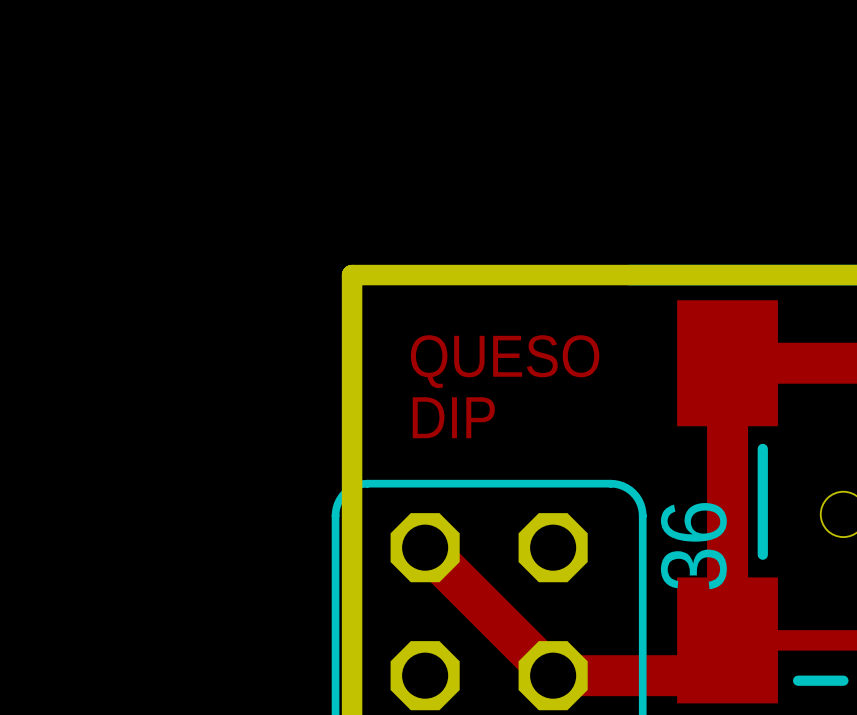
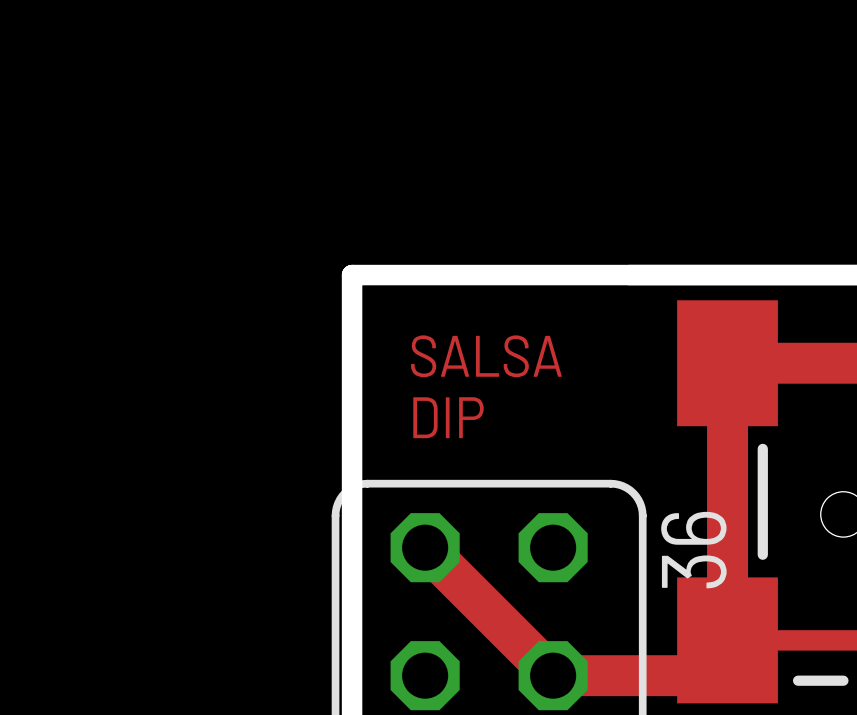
text: QUESO (505, 361) -> SALSA (486, 356)

